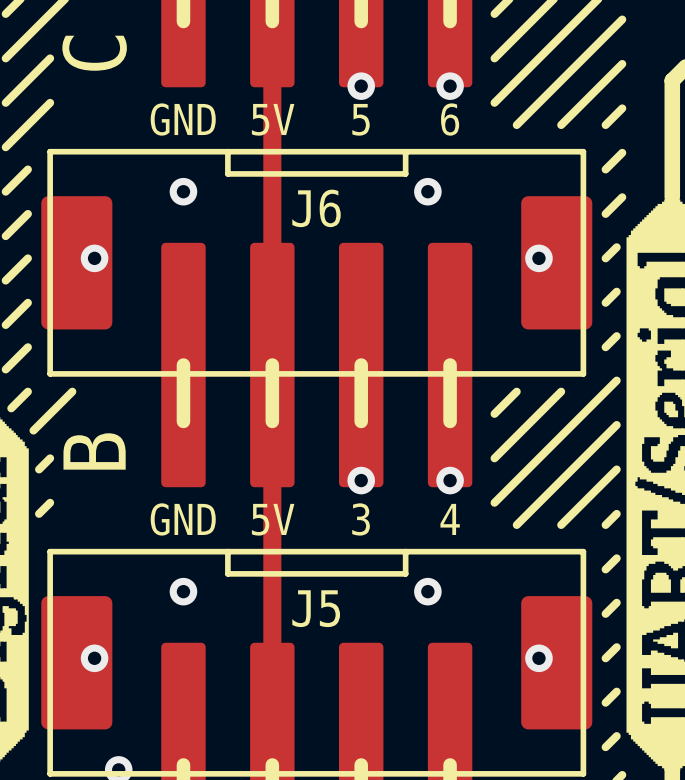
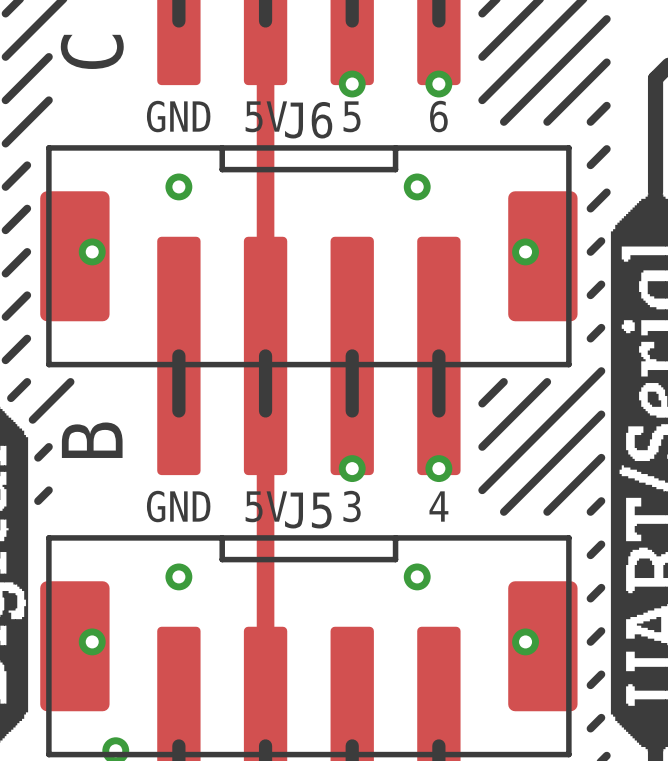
J6 name position: J6 (316, 208) -> J6 (308, 120)
J5 name position: J5 (316, 608) -> J5 (308, 510)

